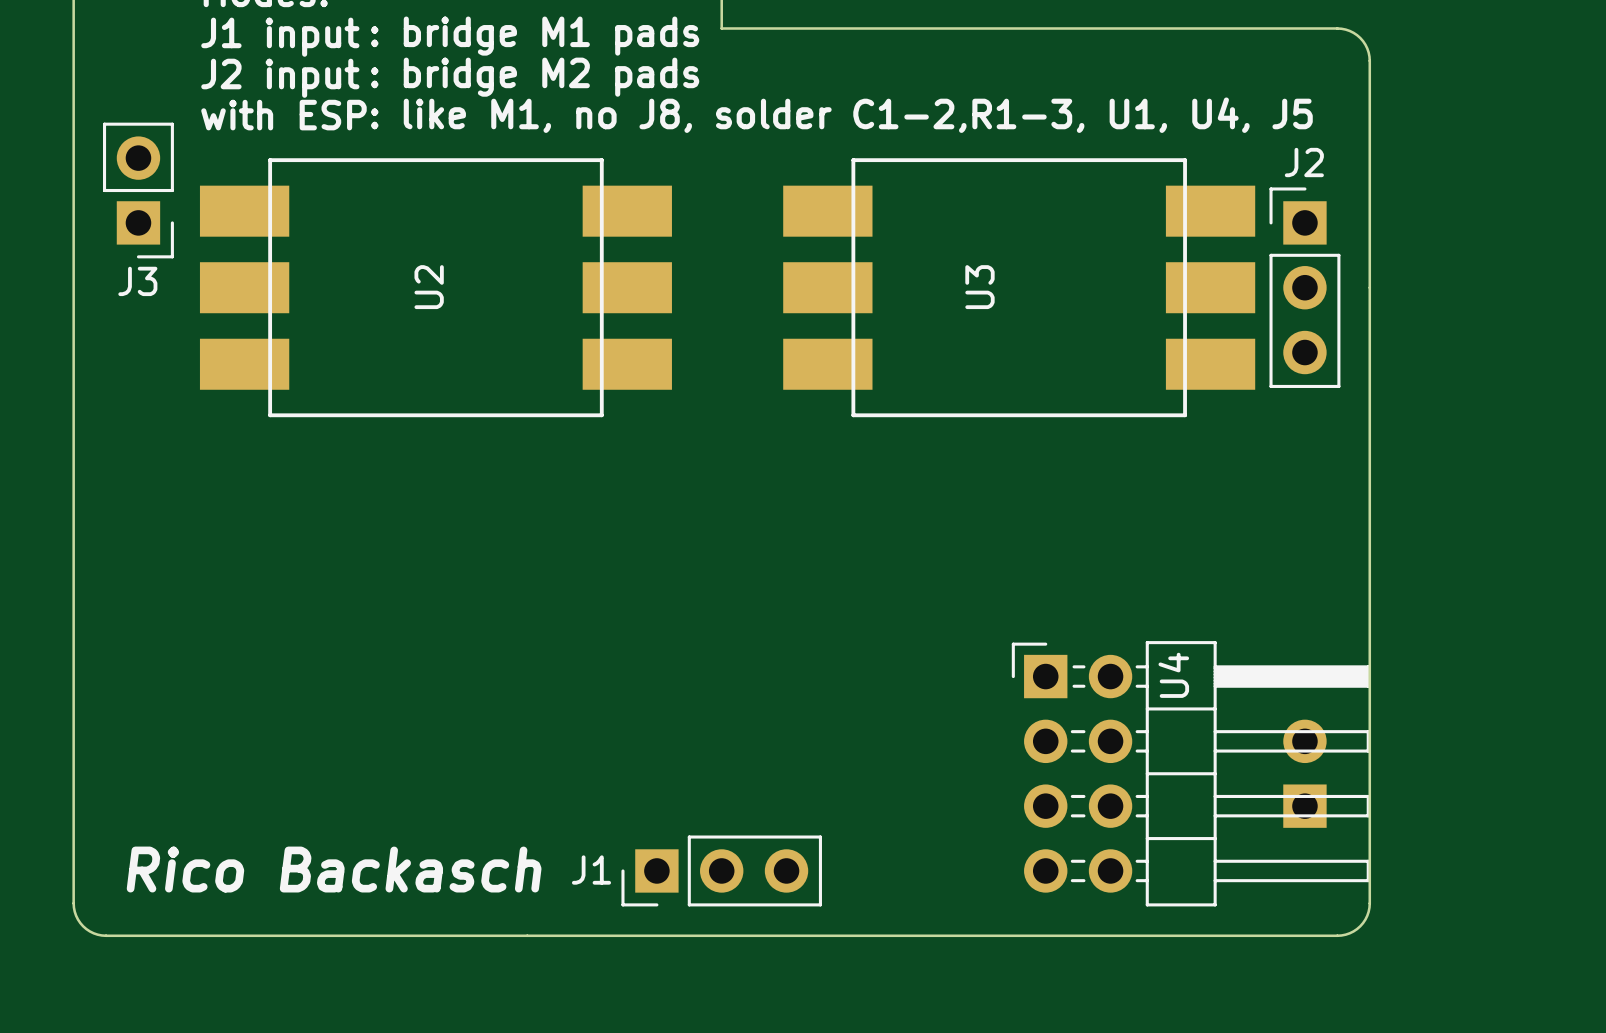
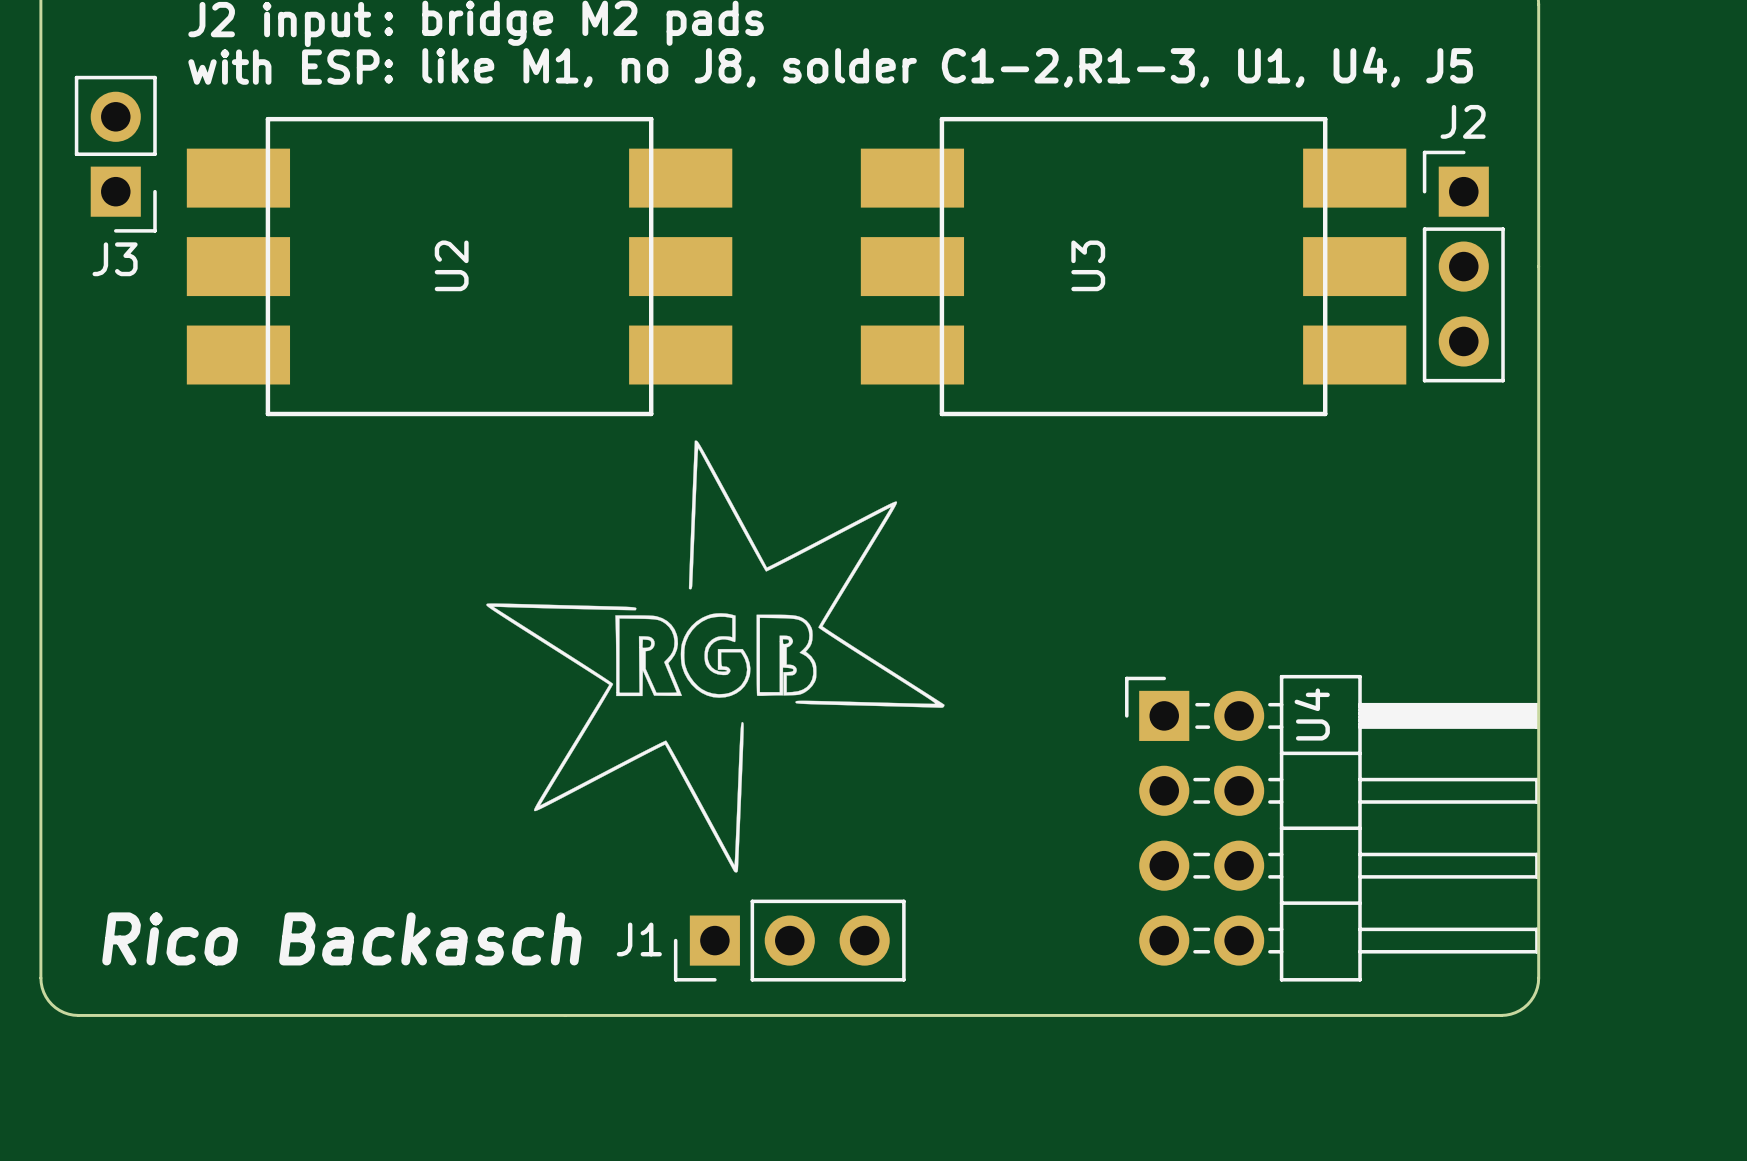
drawing: none -> [486, 440, 945, 873]
part: (1304, 773) -> none

